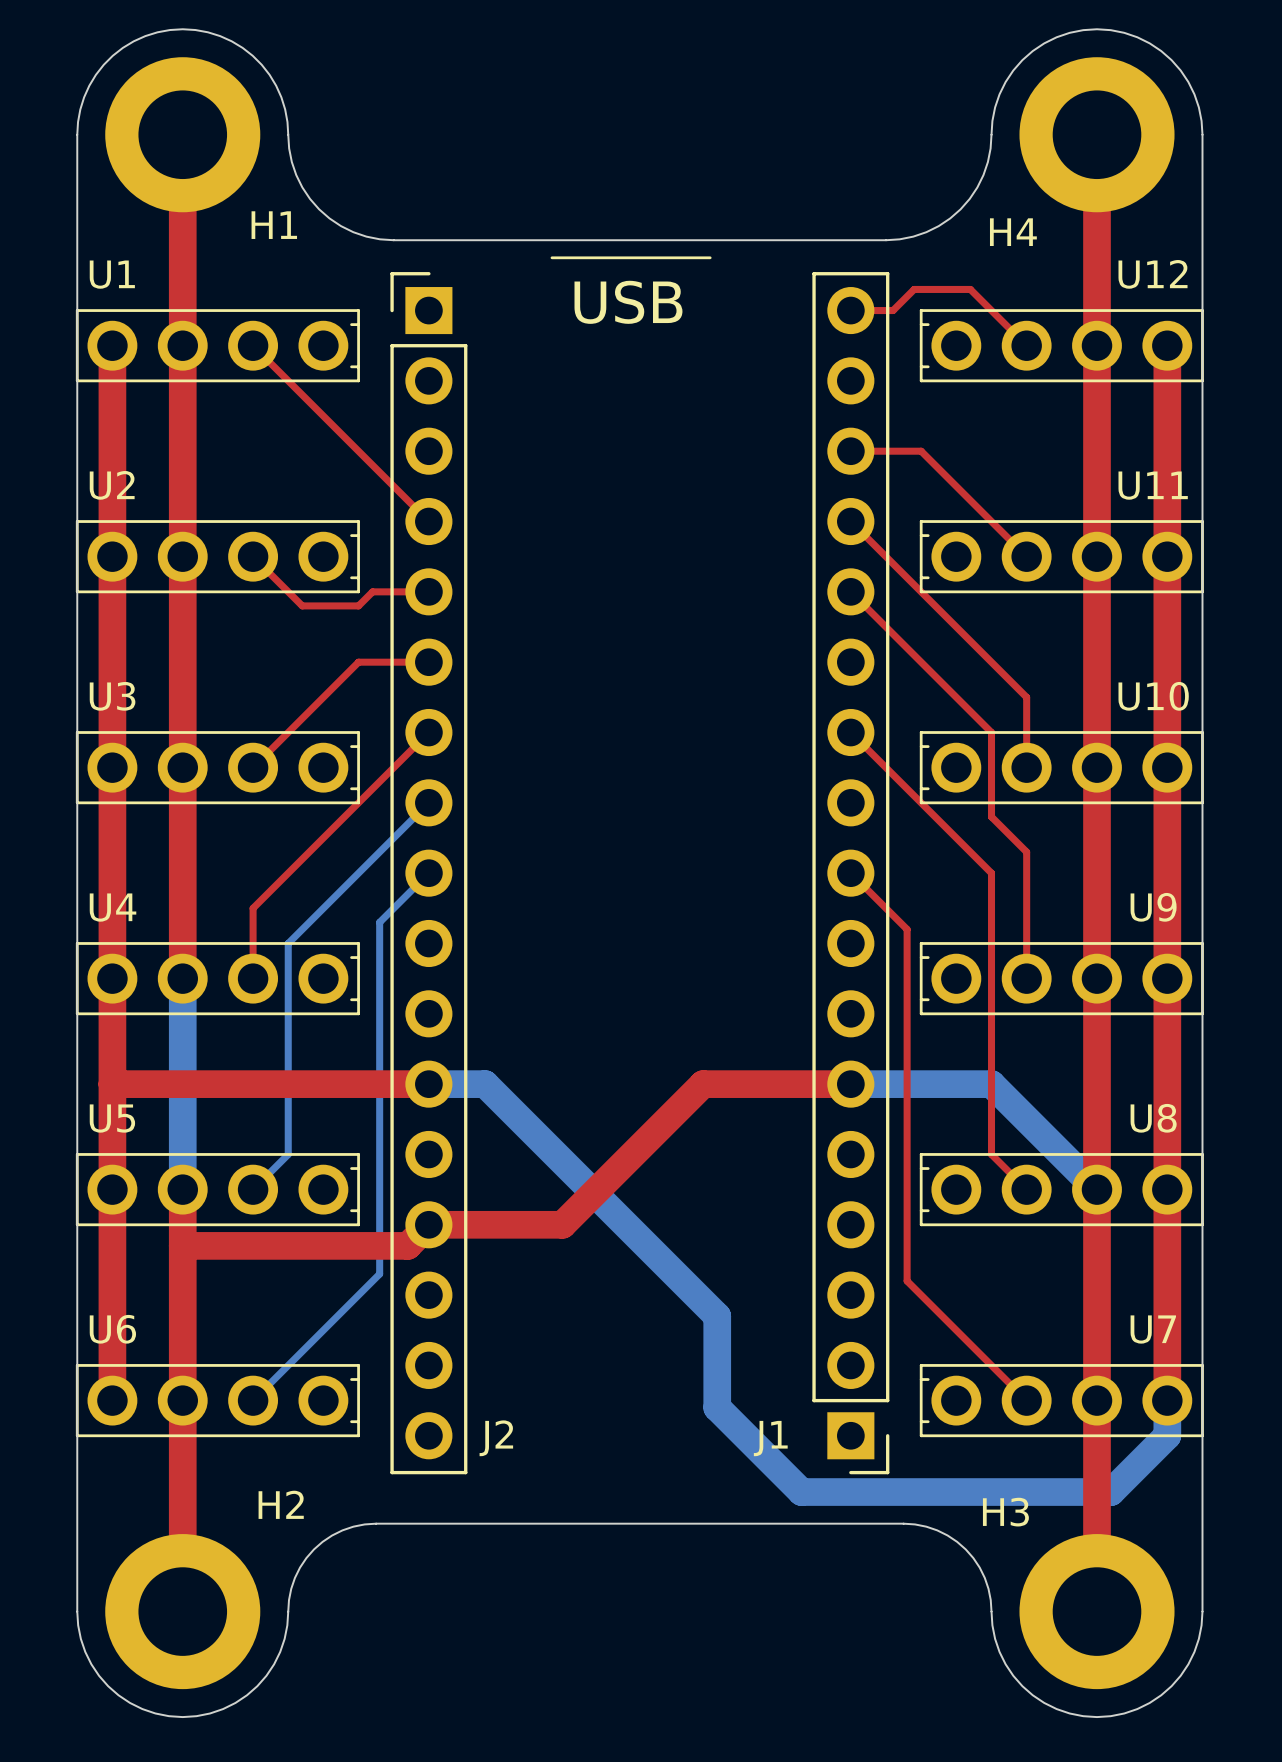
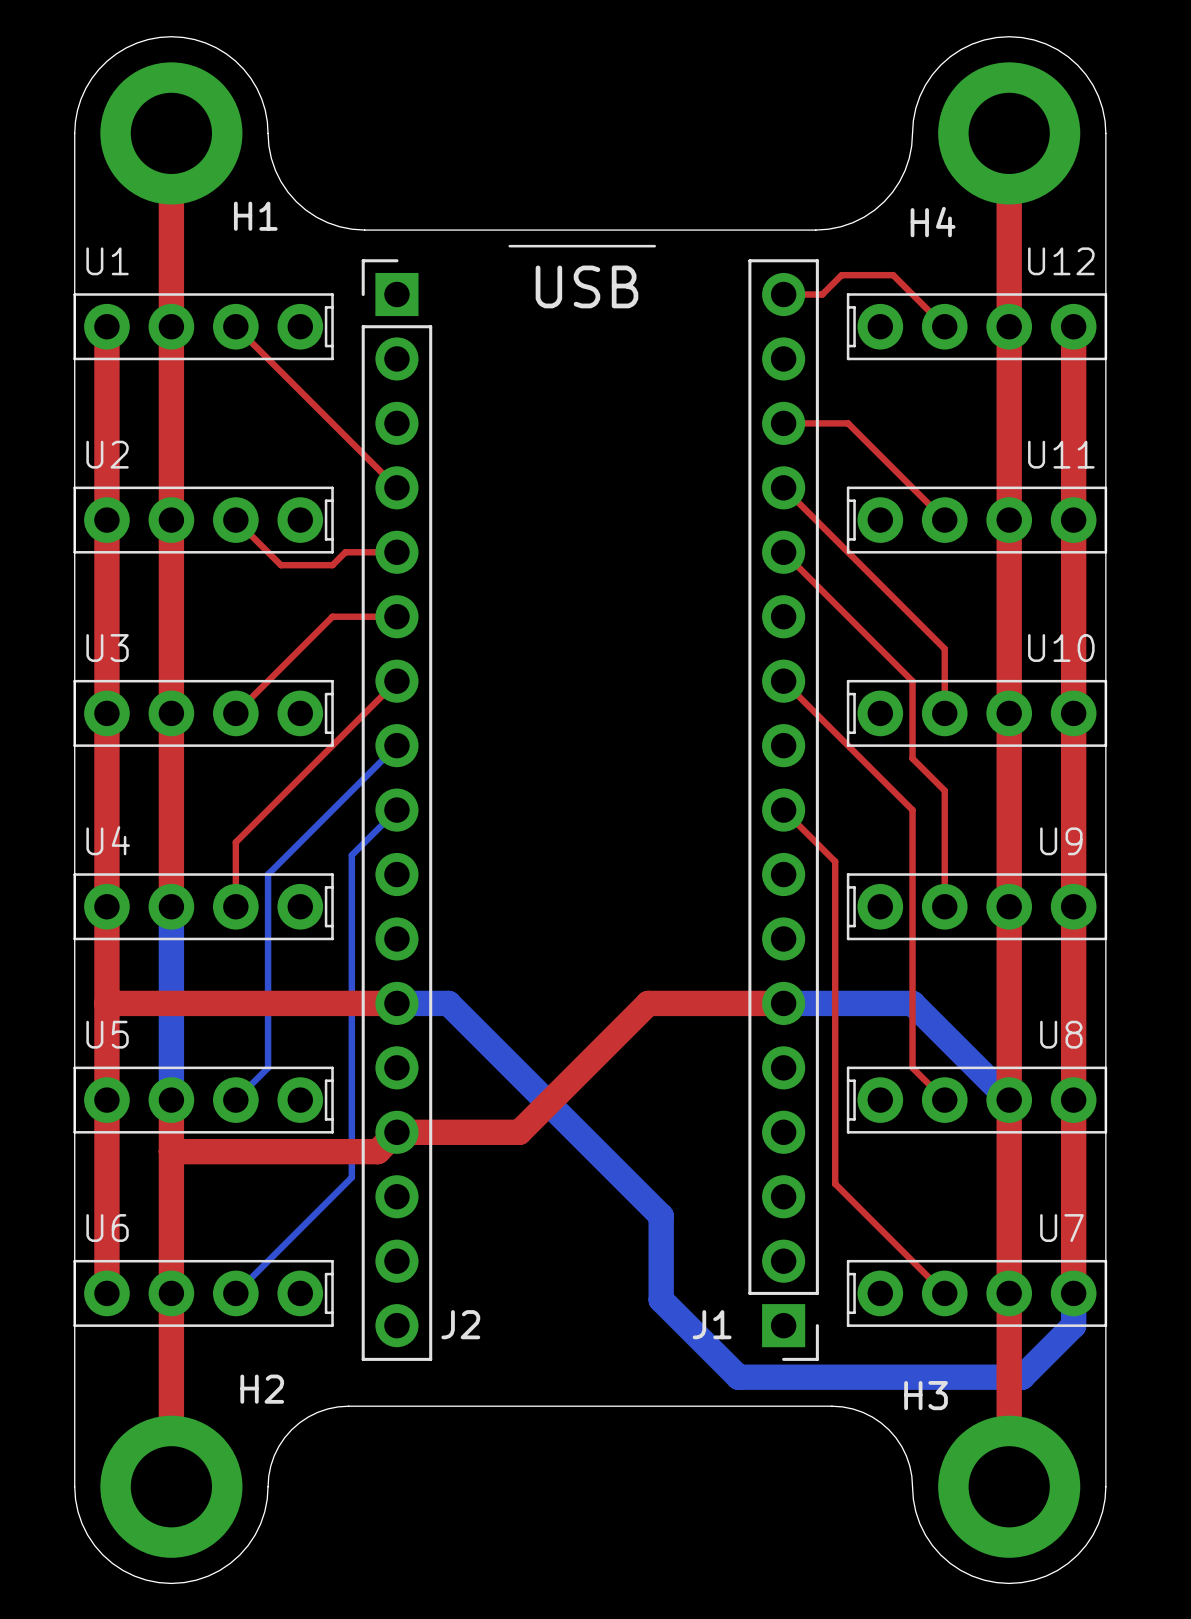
U1 footprint: [75, 309, 360, 383] -> [73, 293, 334, 361]
U12 footprint: [919, 309, 1204, 383] -> [846, 293, 1108, 361]
U2 footprint: [75, 520, 360, 594] -> [73, 486, 334, 554]
U11 footprint: [919, 520, 1204, 594] -> [846, 486, 1108, 554]
U3 footprint: [75, 731, 360, 805] -> [73, 679, 334, 747]
U10 footprint: [919, 731, 1204, 805] -> [846, 679, 1108, 747]
U4 footprint: [75, 942, 360, 1016] -> [73, 873, 334, 941]
U9 footprint: [919, 942, 1204, 1016] -> [846, 873, 1108, 941]
U5 footprint: [75, 1153, 360, 1227] -> [73, 1066, 334, 1134]
U8 footprint: [919, 1153, 1204, 1227] -> [846, 1066, 1108, 1134]
U6 footprint: [75, 1364, 360, 1438] -> [73, 1259, 334, 1327]
U7 footprint: [919, 1364, 1204, 1438] -> [846, 1259, 1108, 1327]

